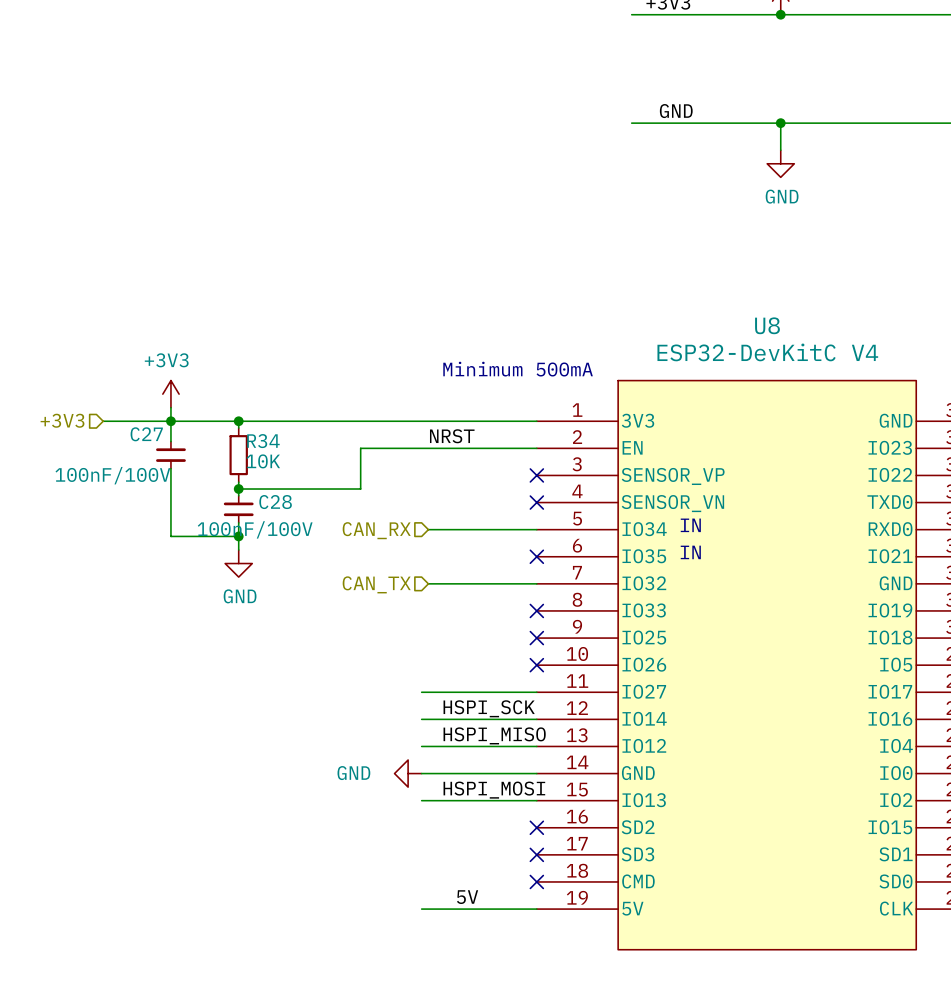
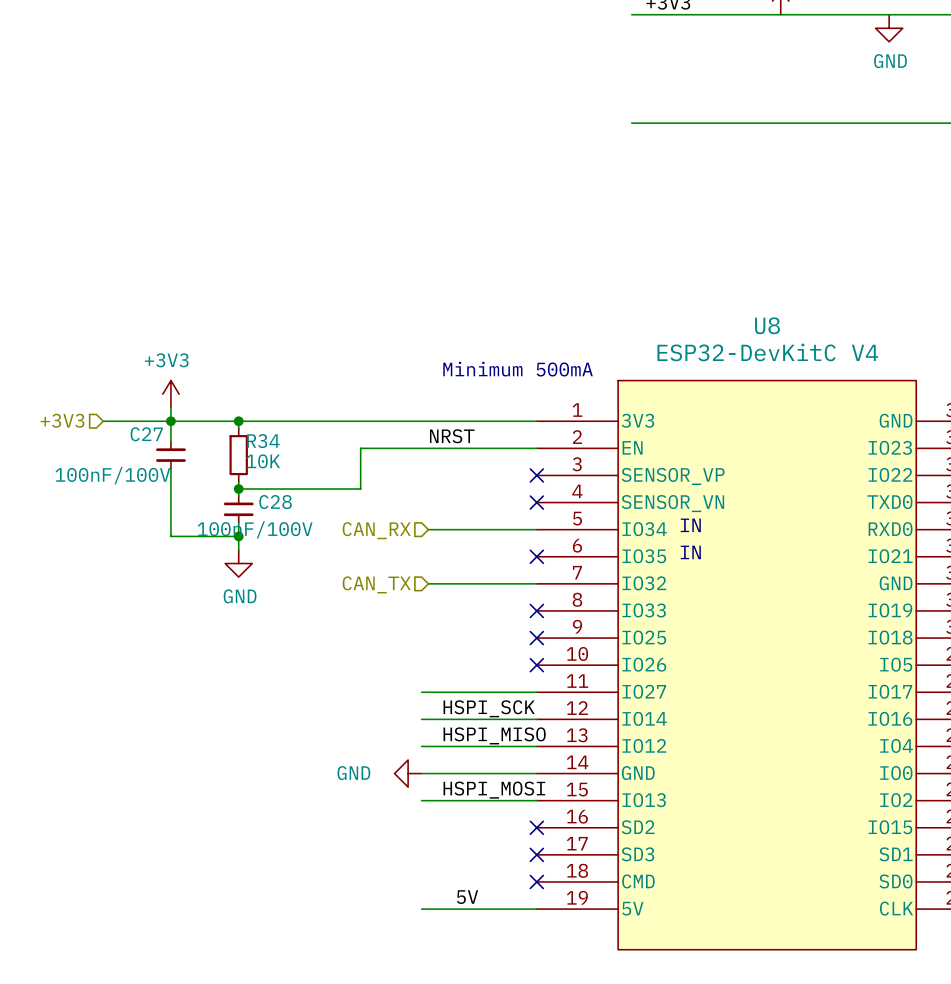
junction: (780, 14) -> none
power symbol: none -> GND (889, 28)
label: GND (676, 111) -> none
wire: (780, 123) (780, 150) -> none
junction: (780, 123) -> none
power symbol: GND (780, 163) -> none

